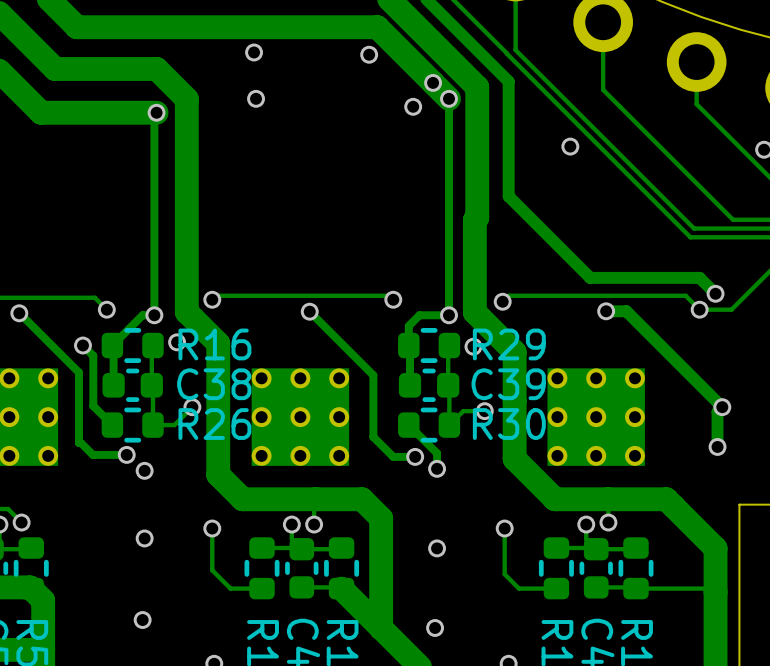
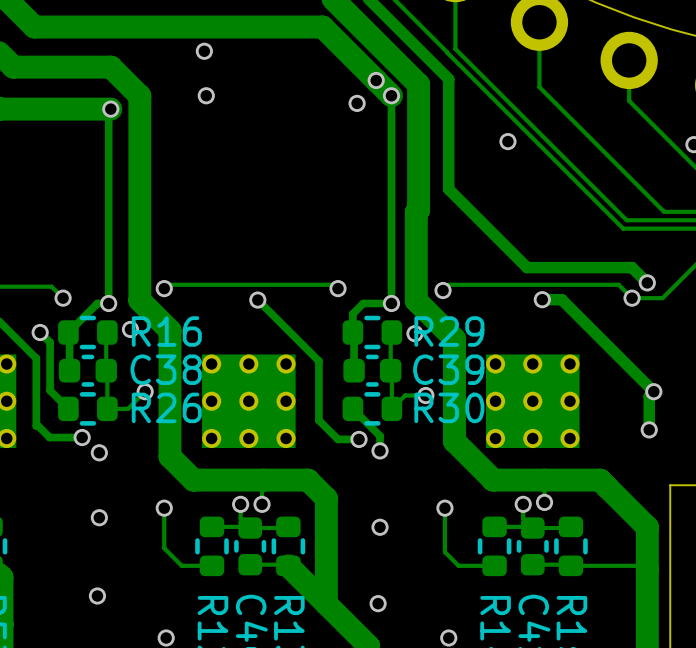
via: (369, 54) -> none

